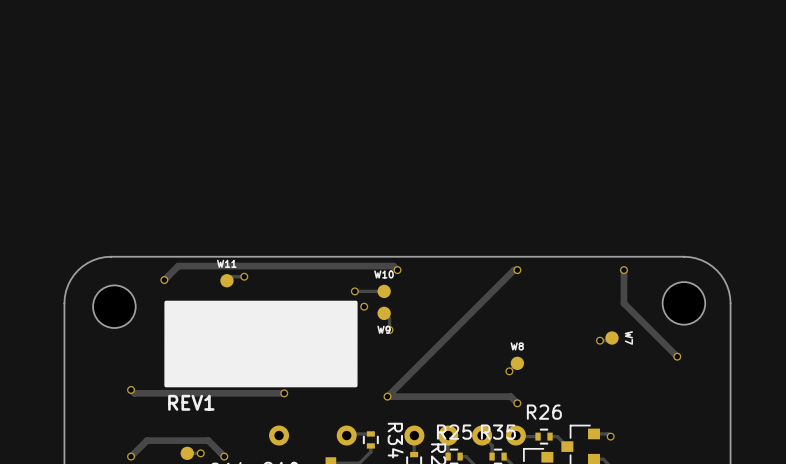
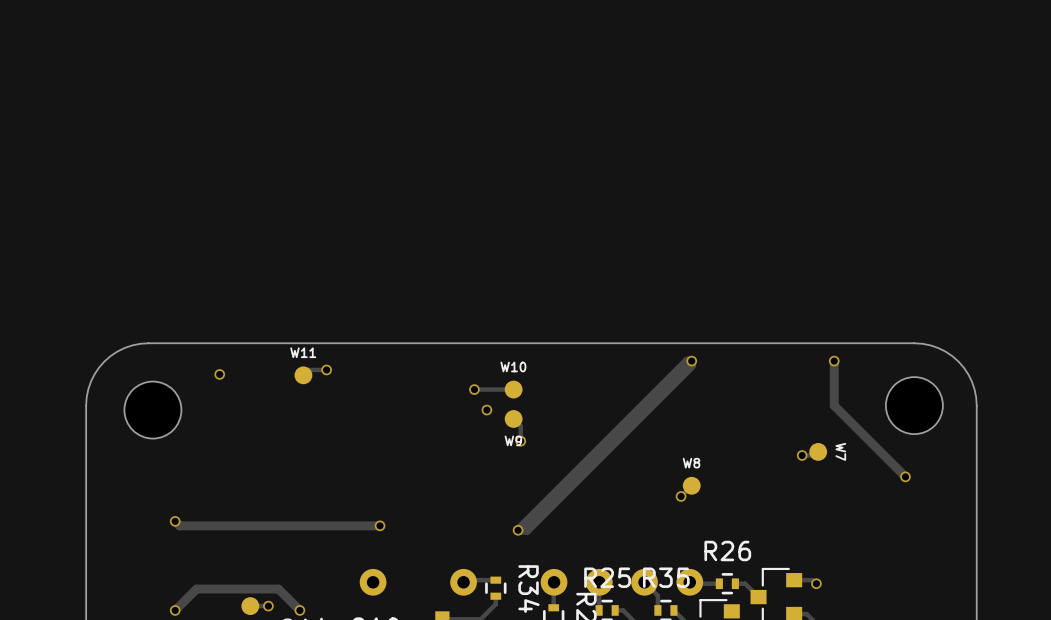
track: (397, 270) (393, 266) (178, 266) (164, 280) -> none
via: (397, 270) -> none
drawing: [164, 300, 358, 388] -> none
track: (394, 396) (510, 396) (517, 403) -> (526, 530) (691, 365)
text: REV1 (191, 402) -> none
via: (517, 403) -> none

